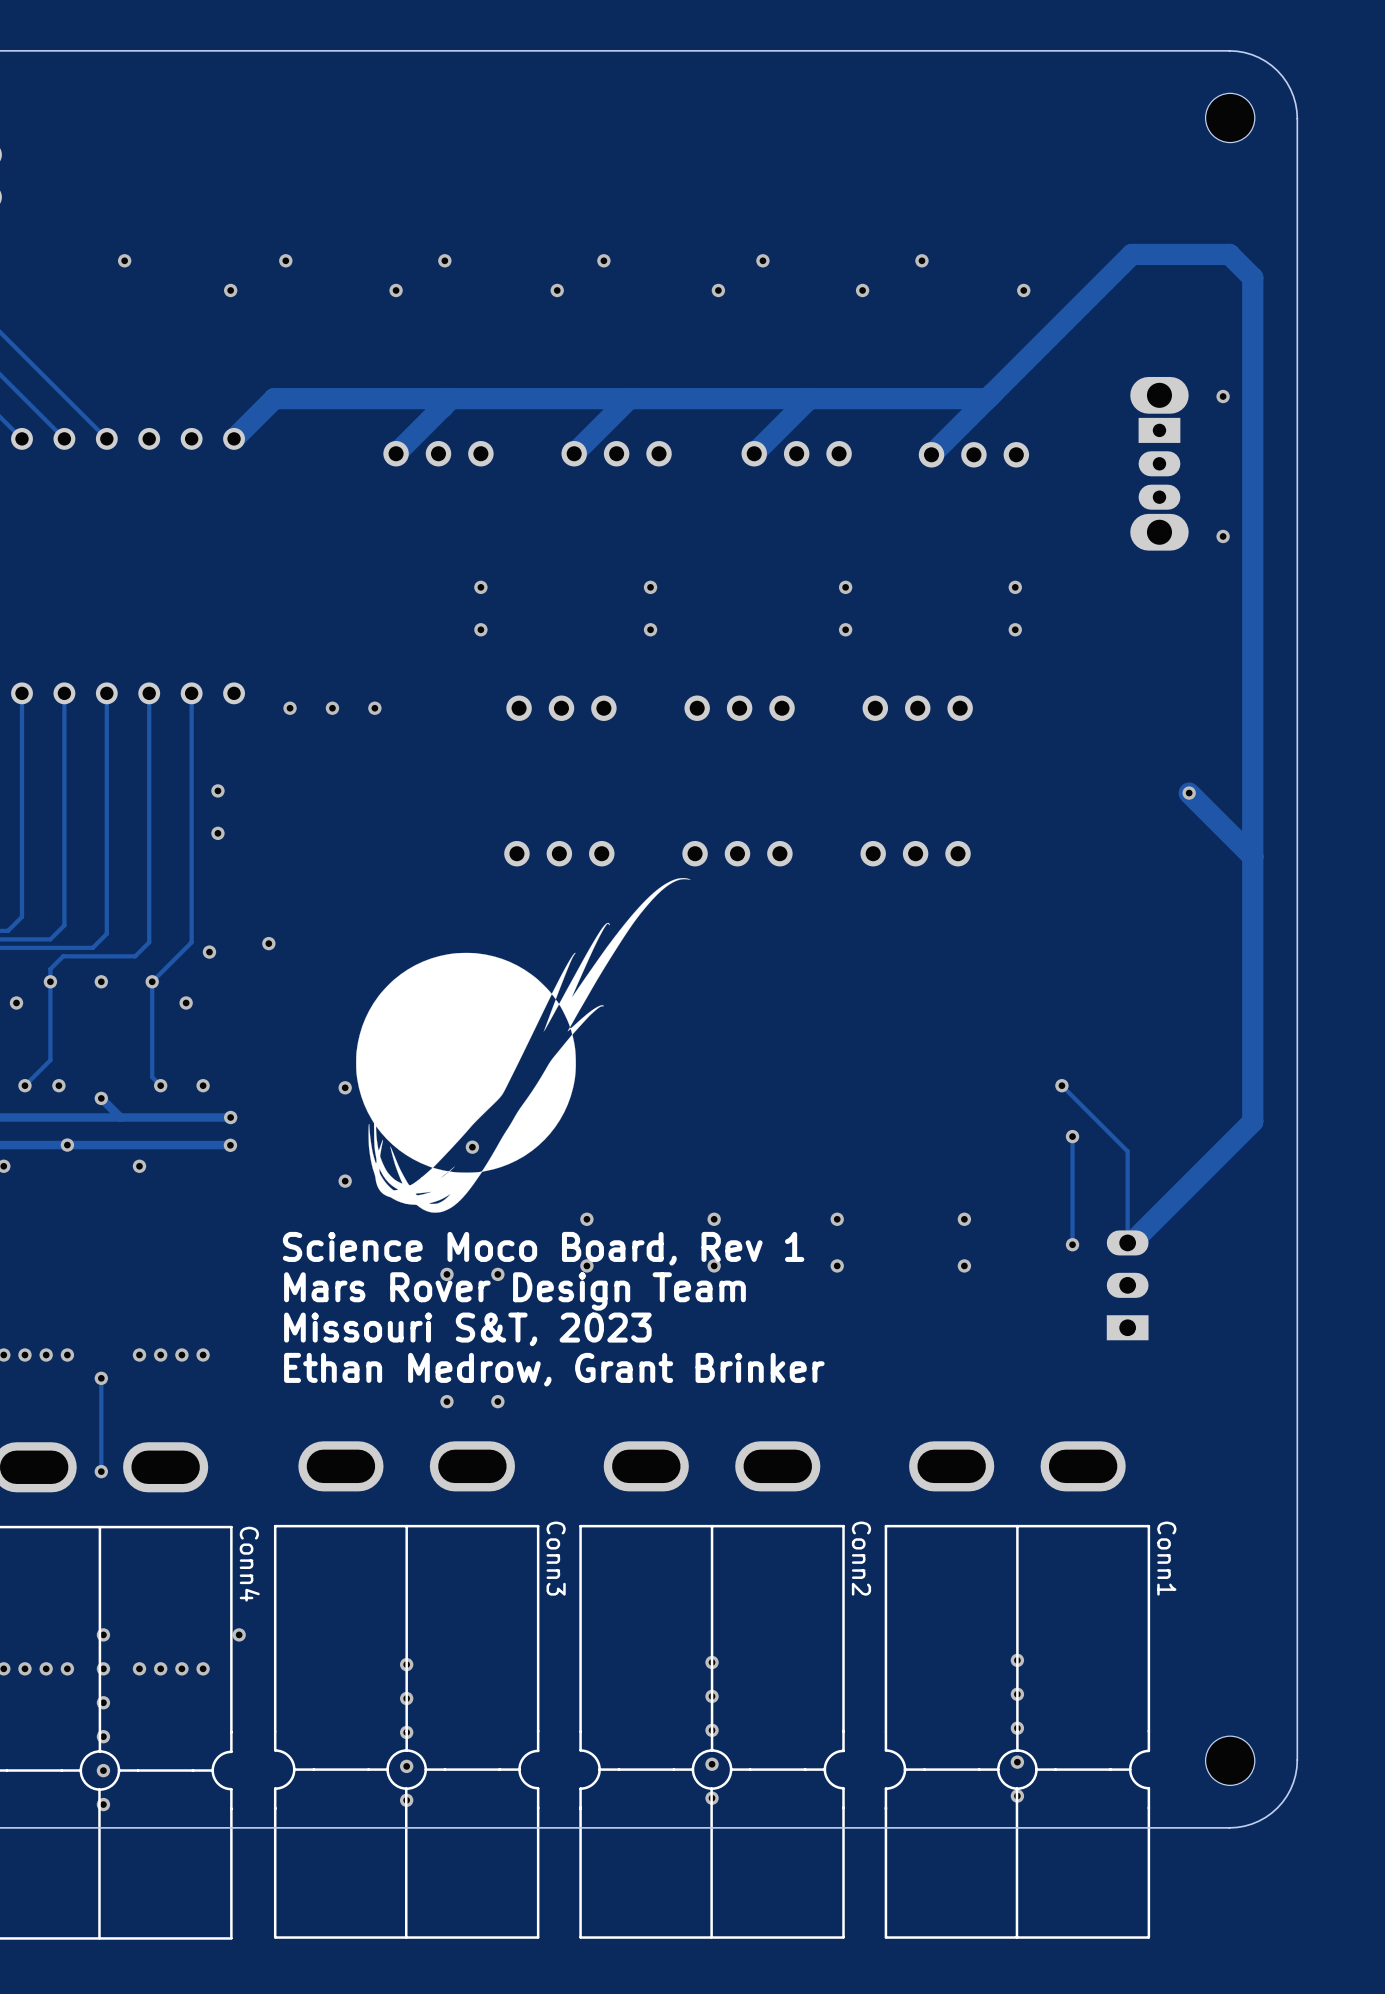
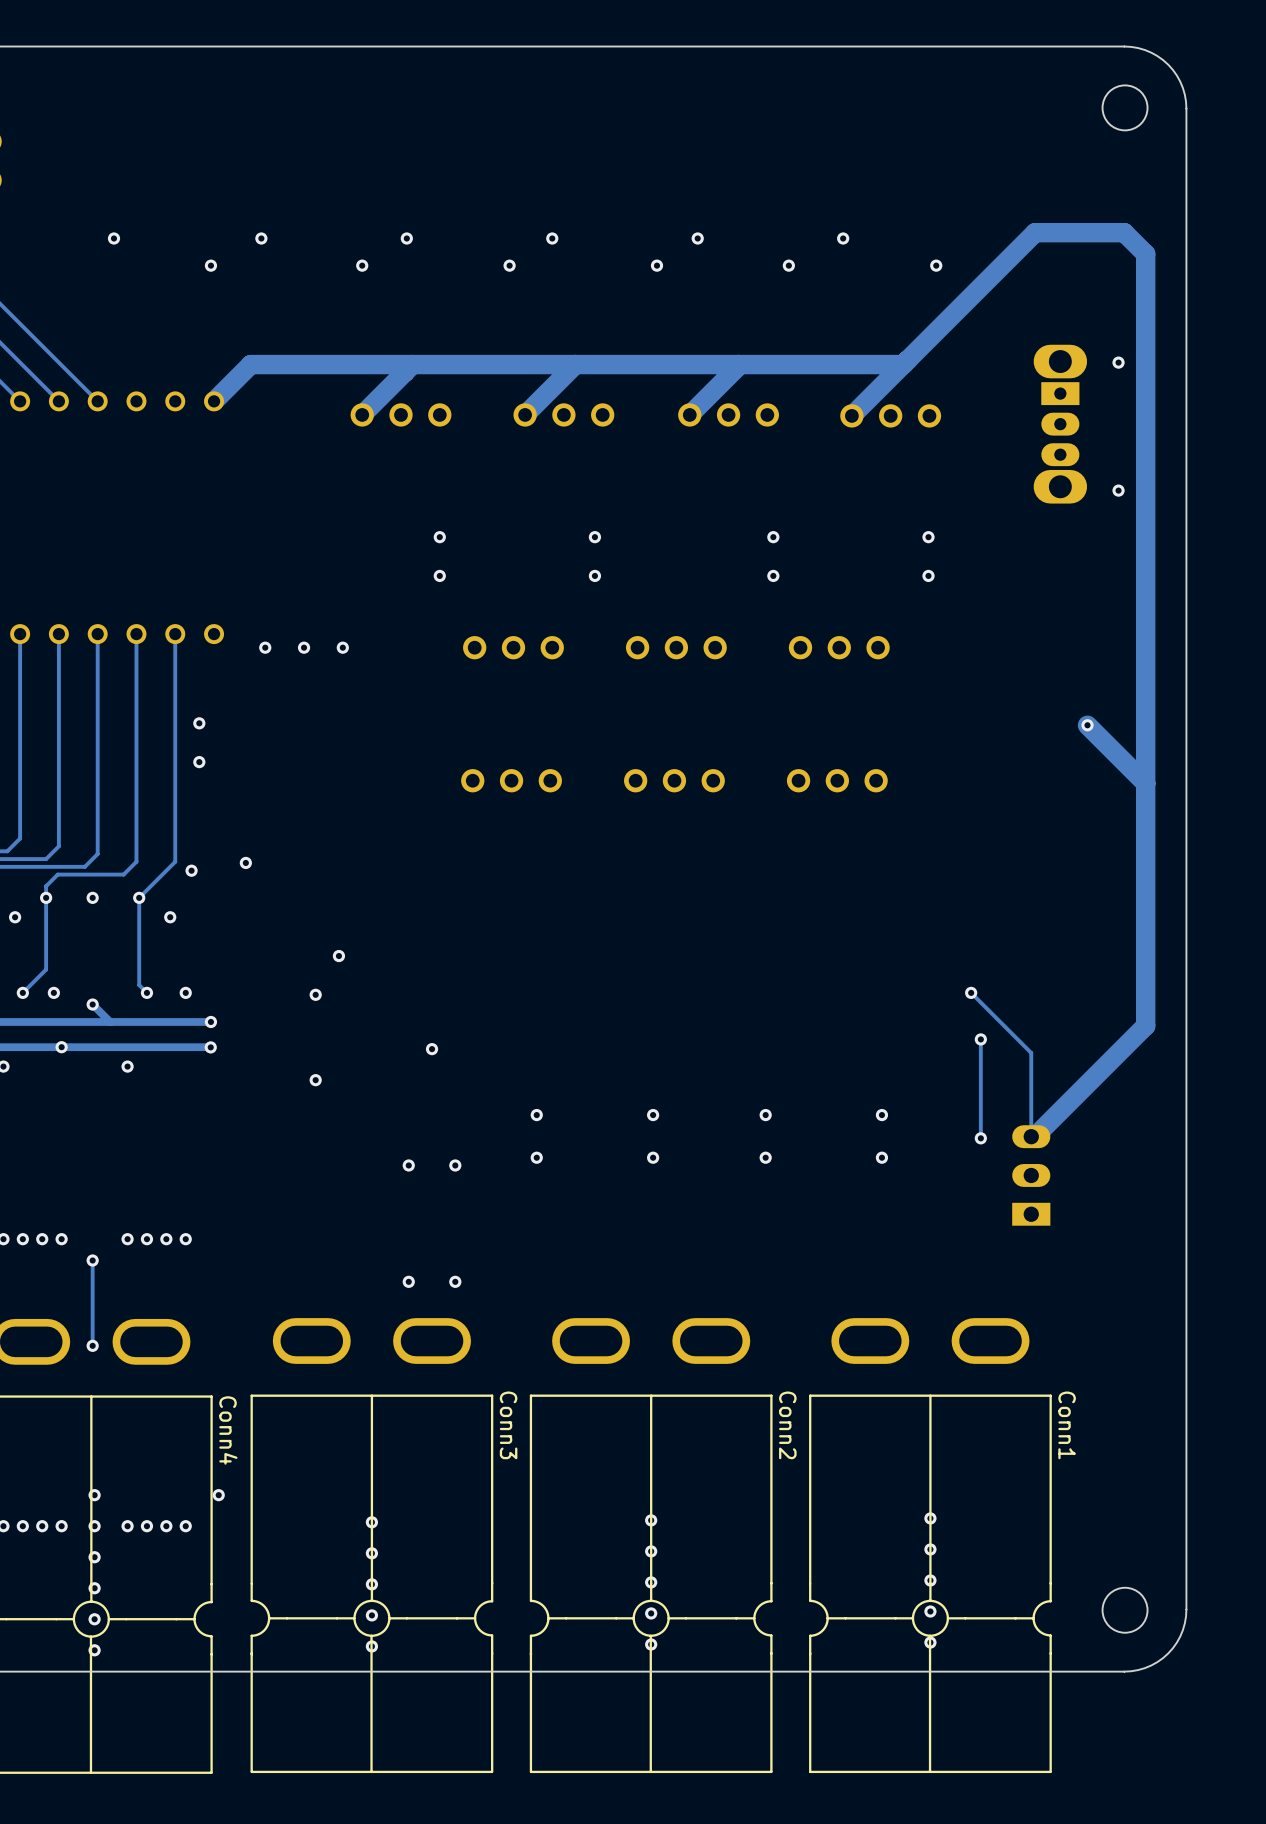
drawing: [356, 878, 691, 1213] -> none
text: Science Moco Board, Rev 1 (543, 1248) -> none
text: Mars Rover Design Team (514, 1291) -> none
text: Missouri S&T, 2023 (467, 1329) -> none
text: Ethan Medrow, Grant Brinker (554, 1369) -> none

